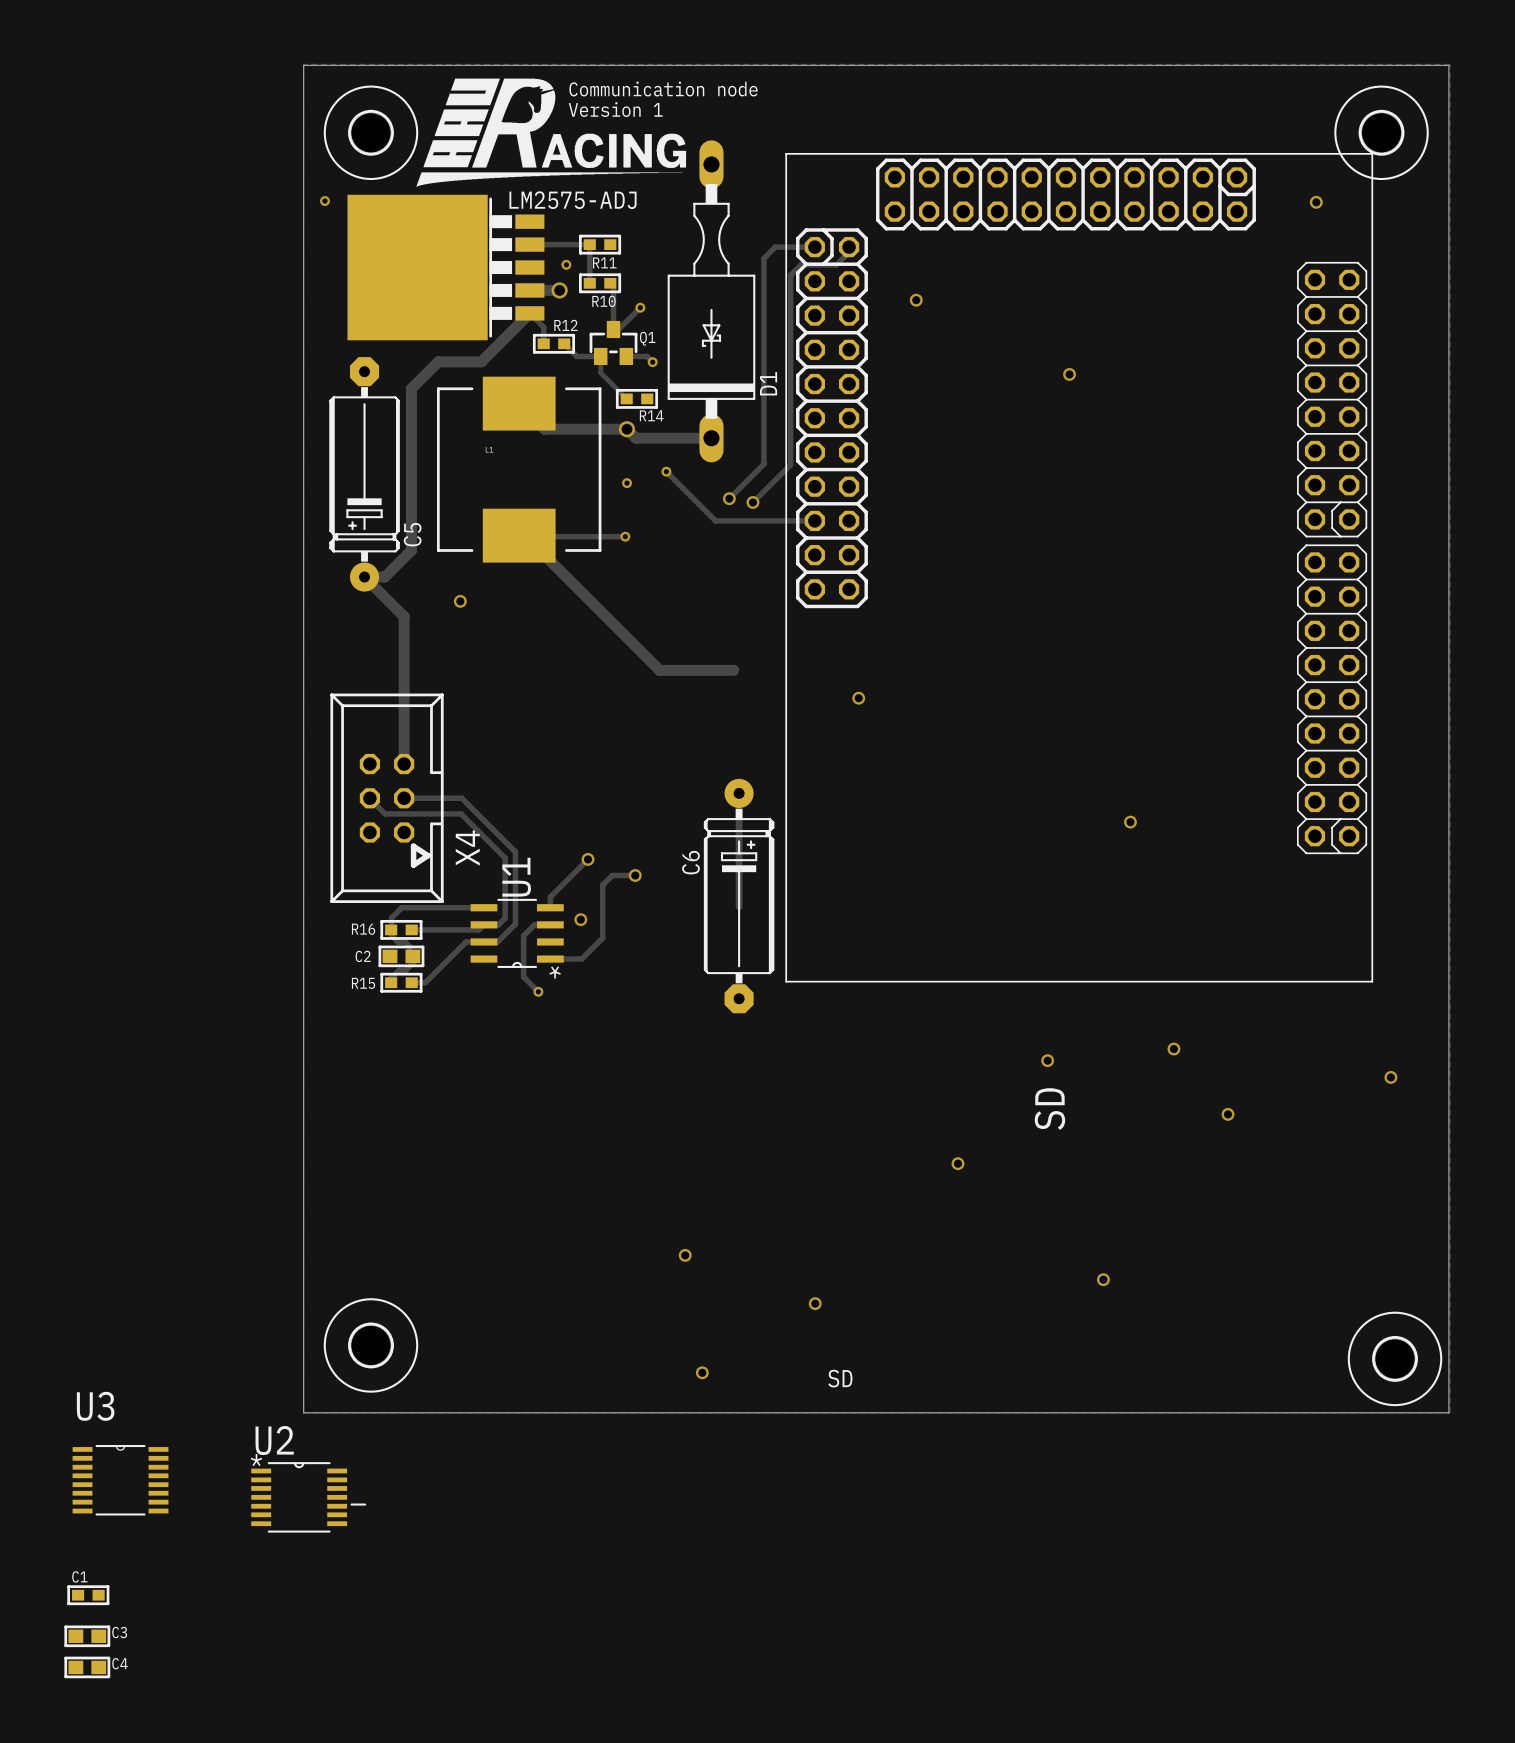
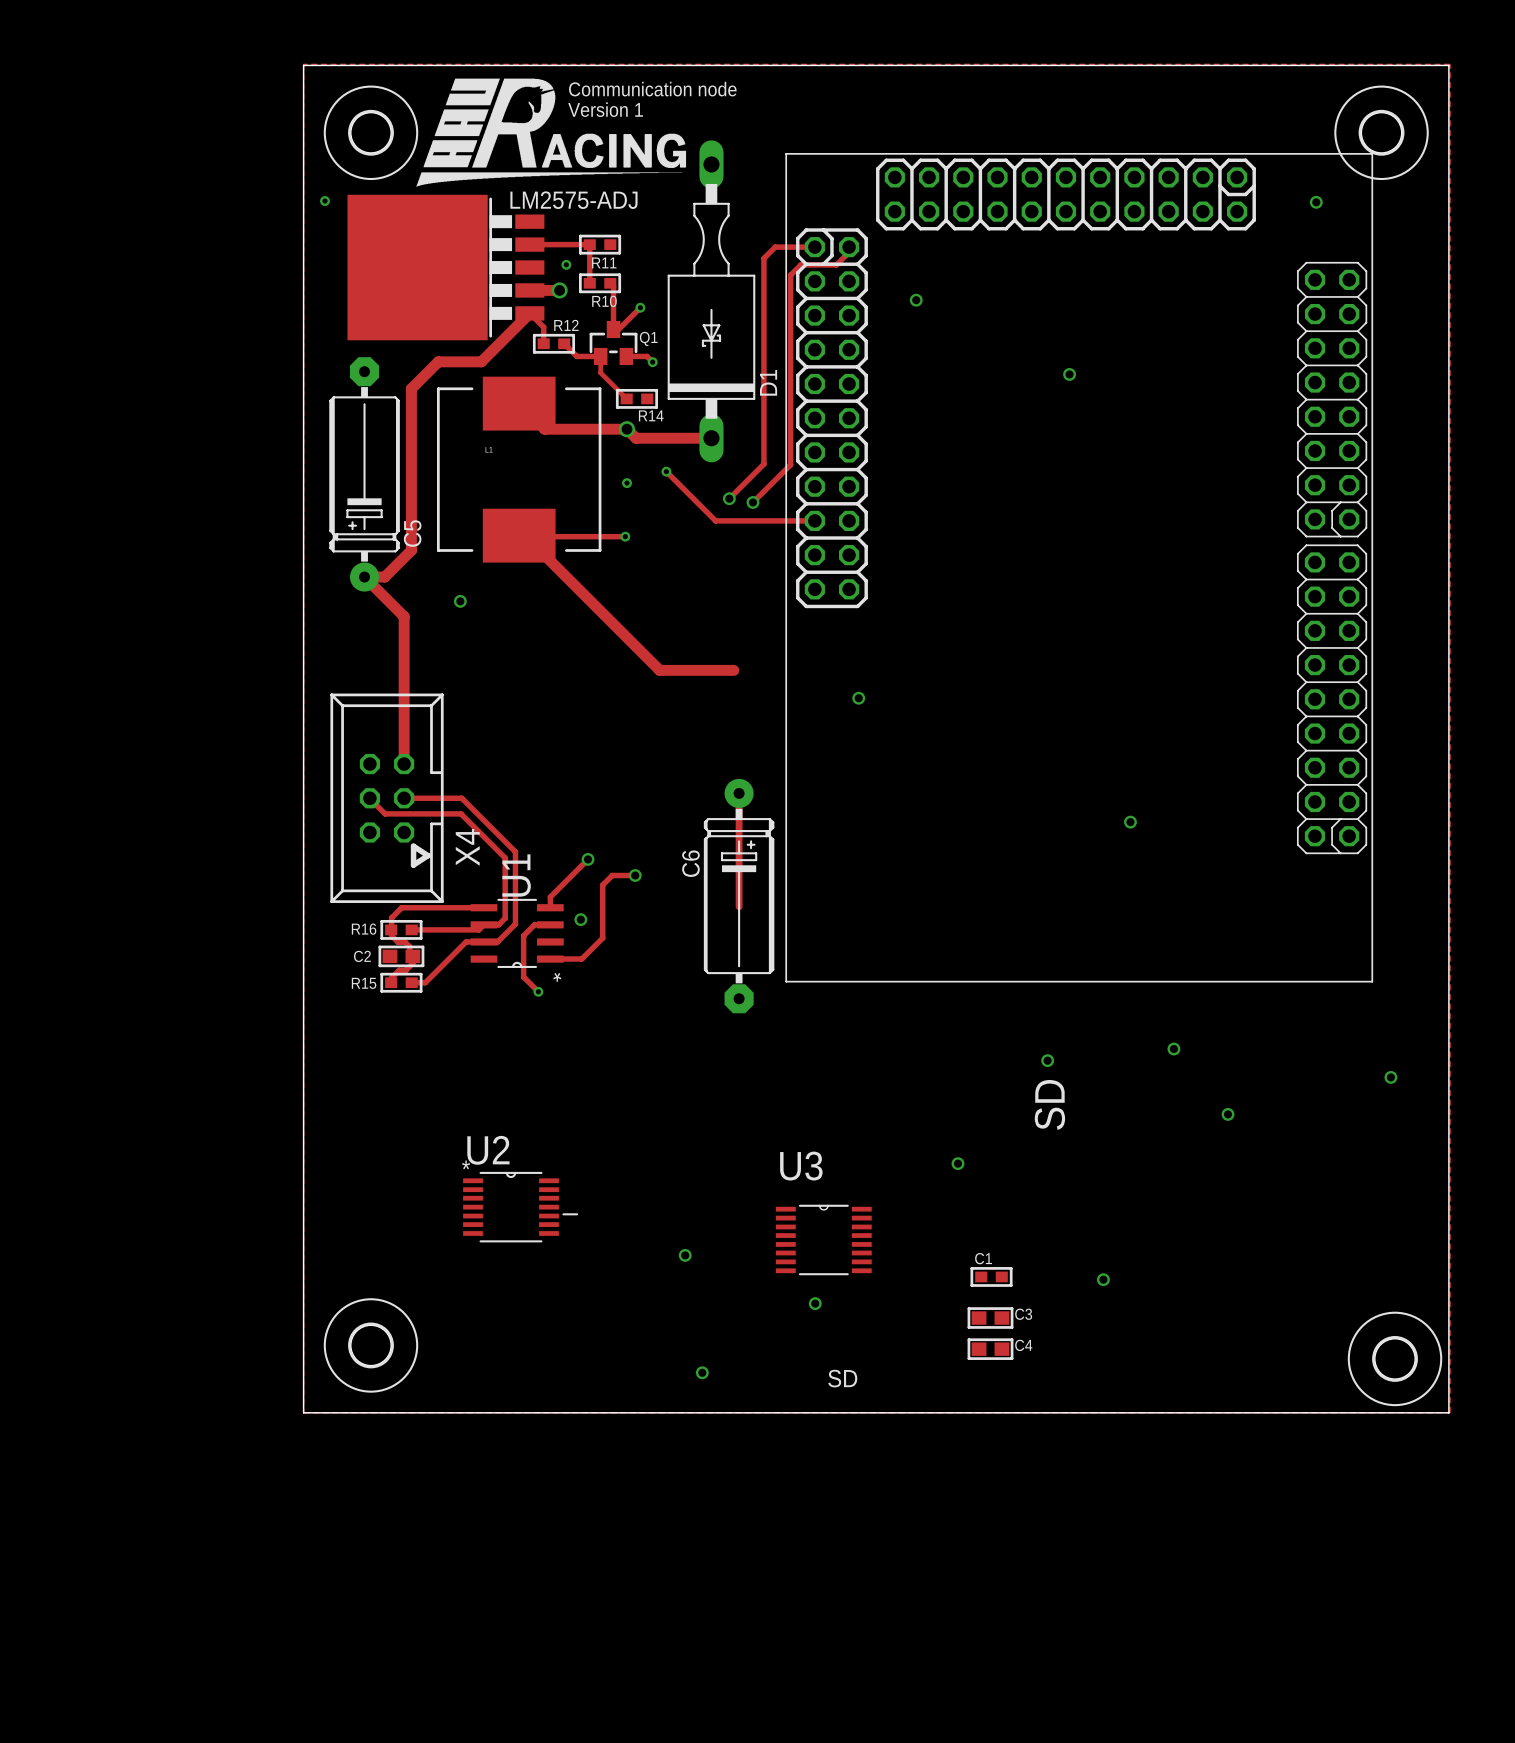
U3 position: (120, 1480) -> (823, 1239)
U2 position: (308, 1497) -> (520, 1207)
C1 position: (88, 1595) -> (991, 1276)
C3 position: (87, 1636) -> (990, 1318)
C4 position: (87, 1667) -> (990, 1349)

